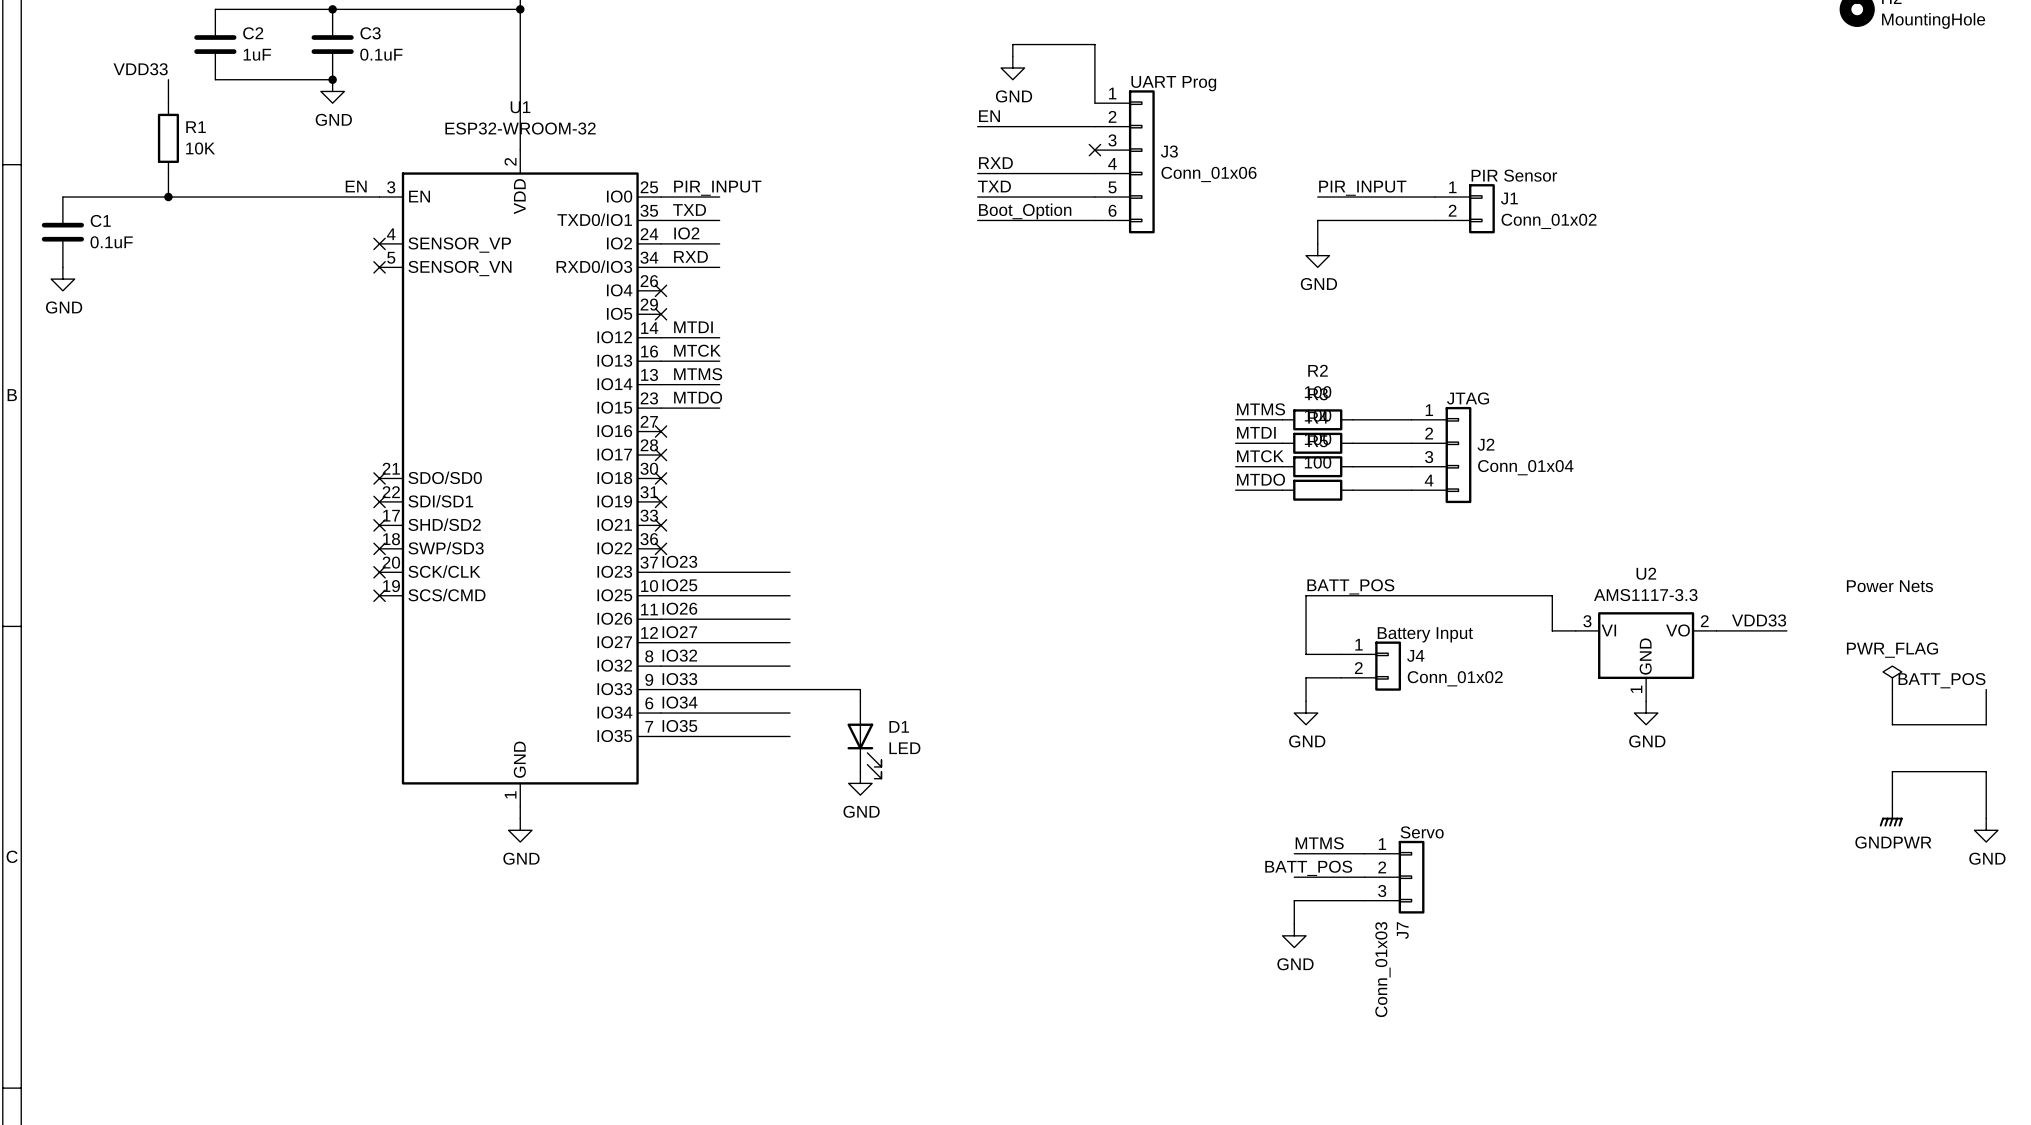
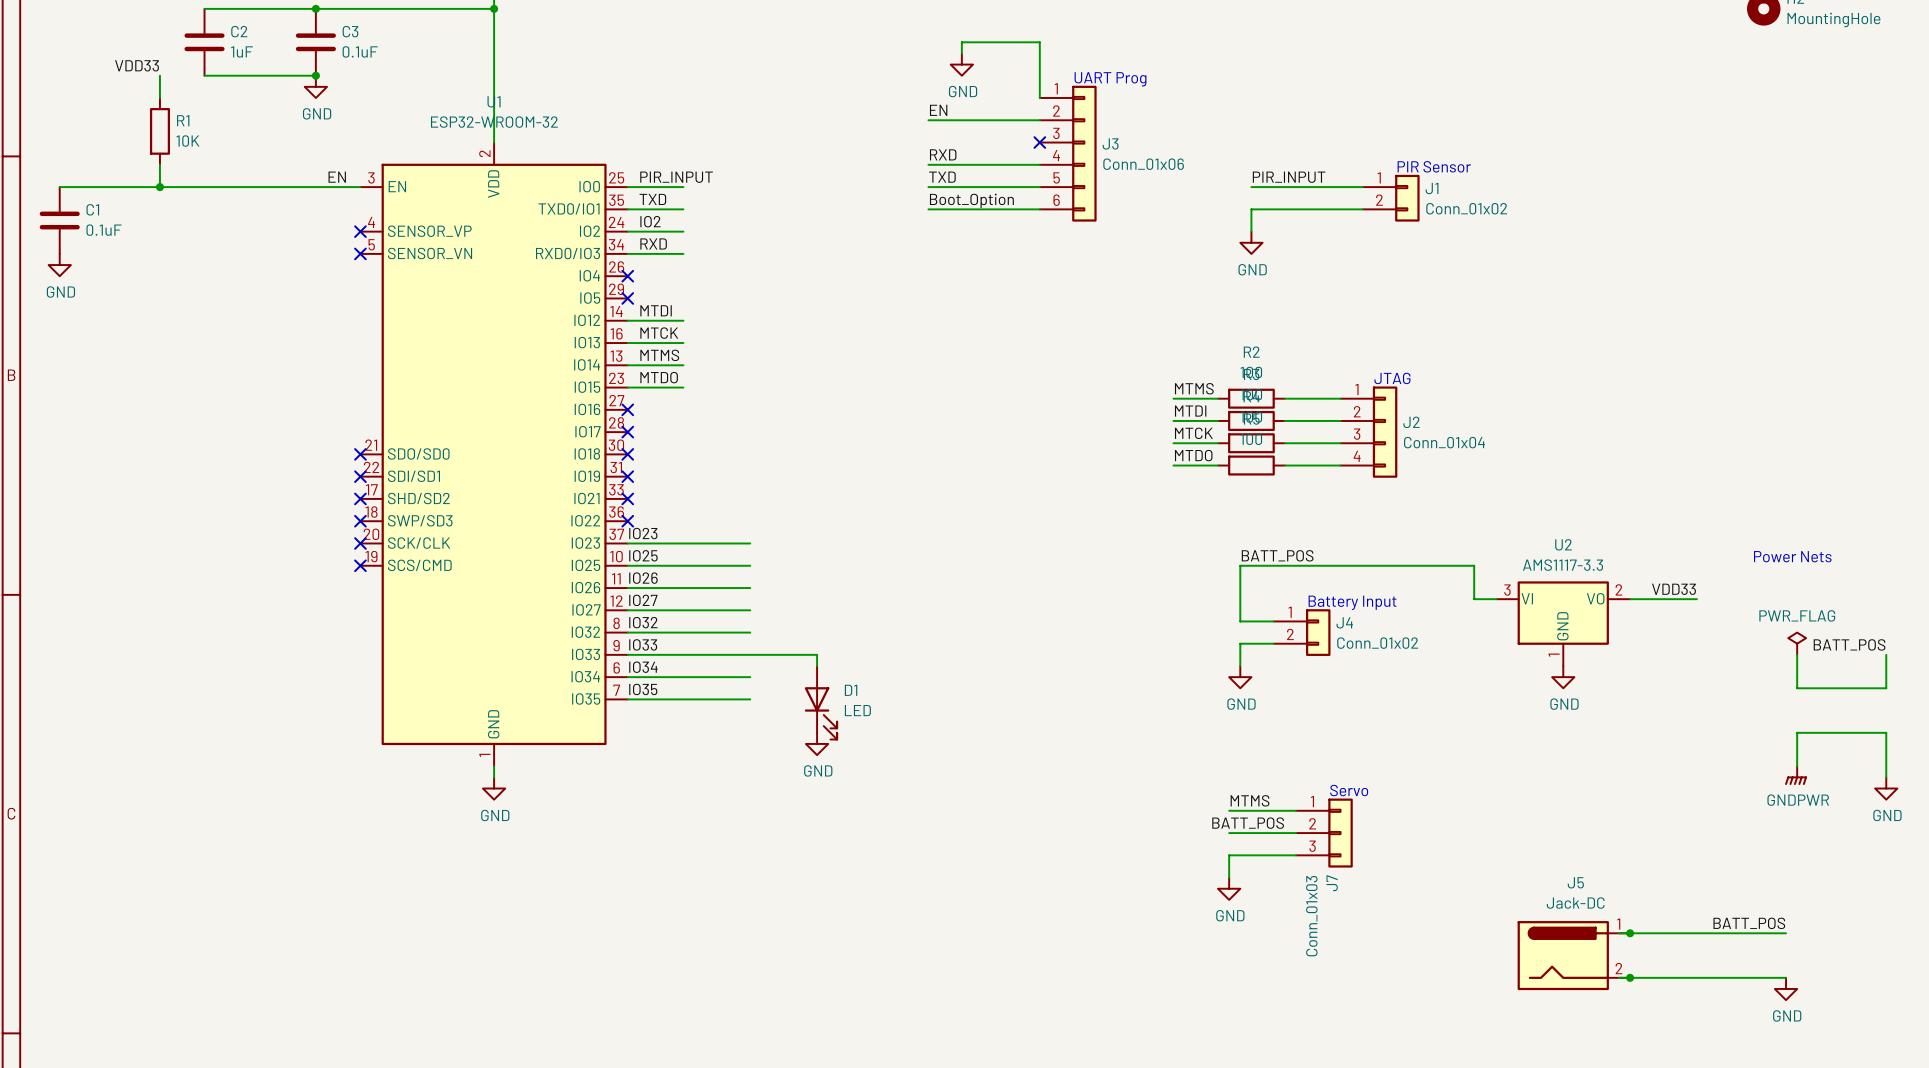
label: none -> BATT_POS (1749, 923)
wire: none -> (1618, 933) (1786, 933)
junction: none -> (1630, 933)
J5: none -> Jack-DC (1573, 955)
wire: none -> (1618, 977) (1786, 977)
junction: none -> (1630, 977)
power symbol: none -> GND (1786, 988)

